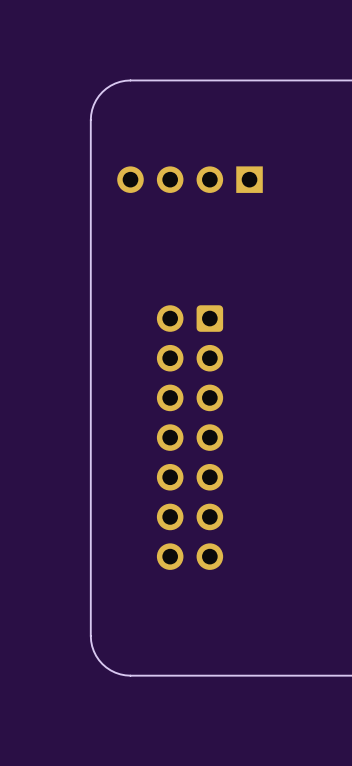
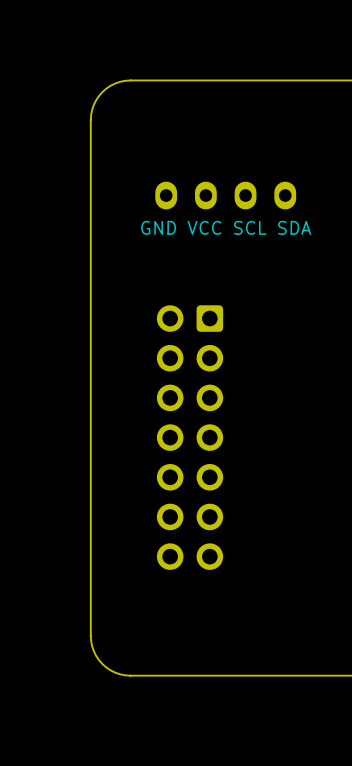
part: (190, 179) -> none
part: none -> (225, 195)

